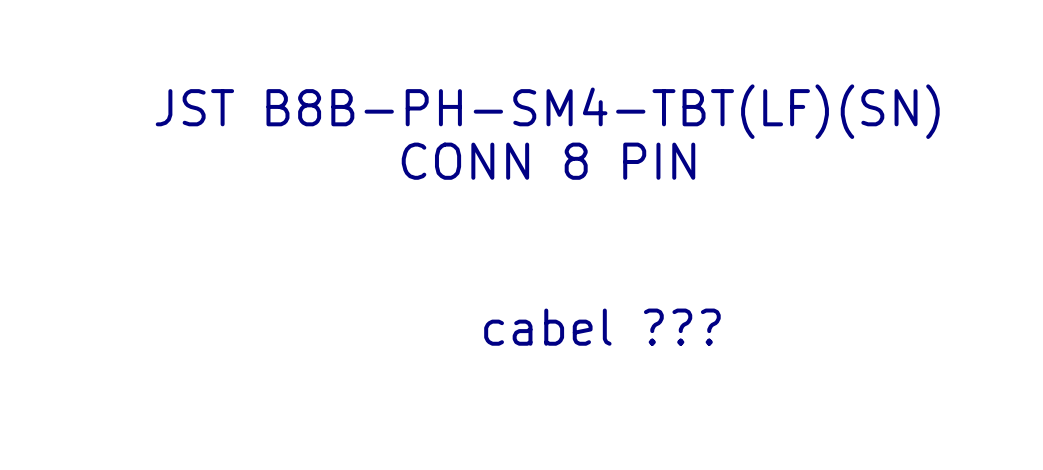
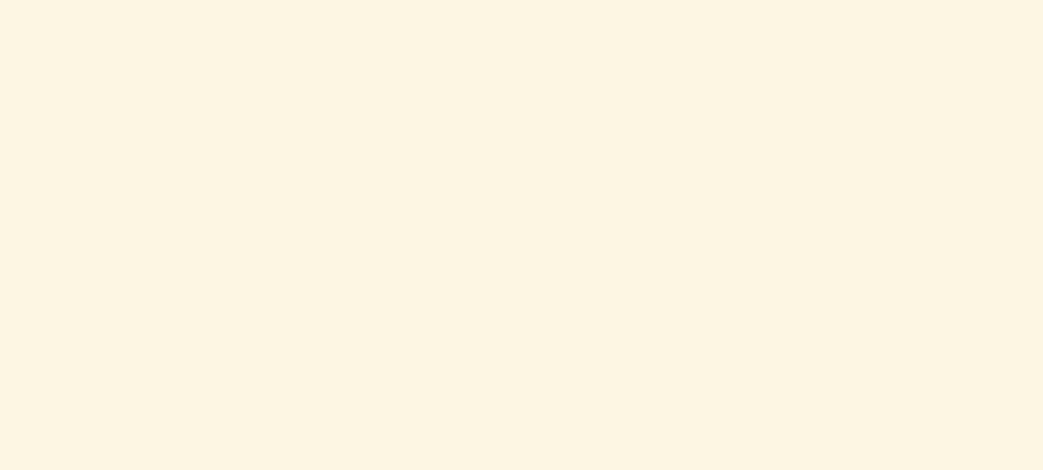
text: JST B8B-PH-SM4-TBT(LF)(SN) (547, 111) -> none
text: CONN 8 PIN (548, 161) -> none
text: cabel ??? (602, 327) -> none

